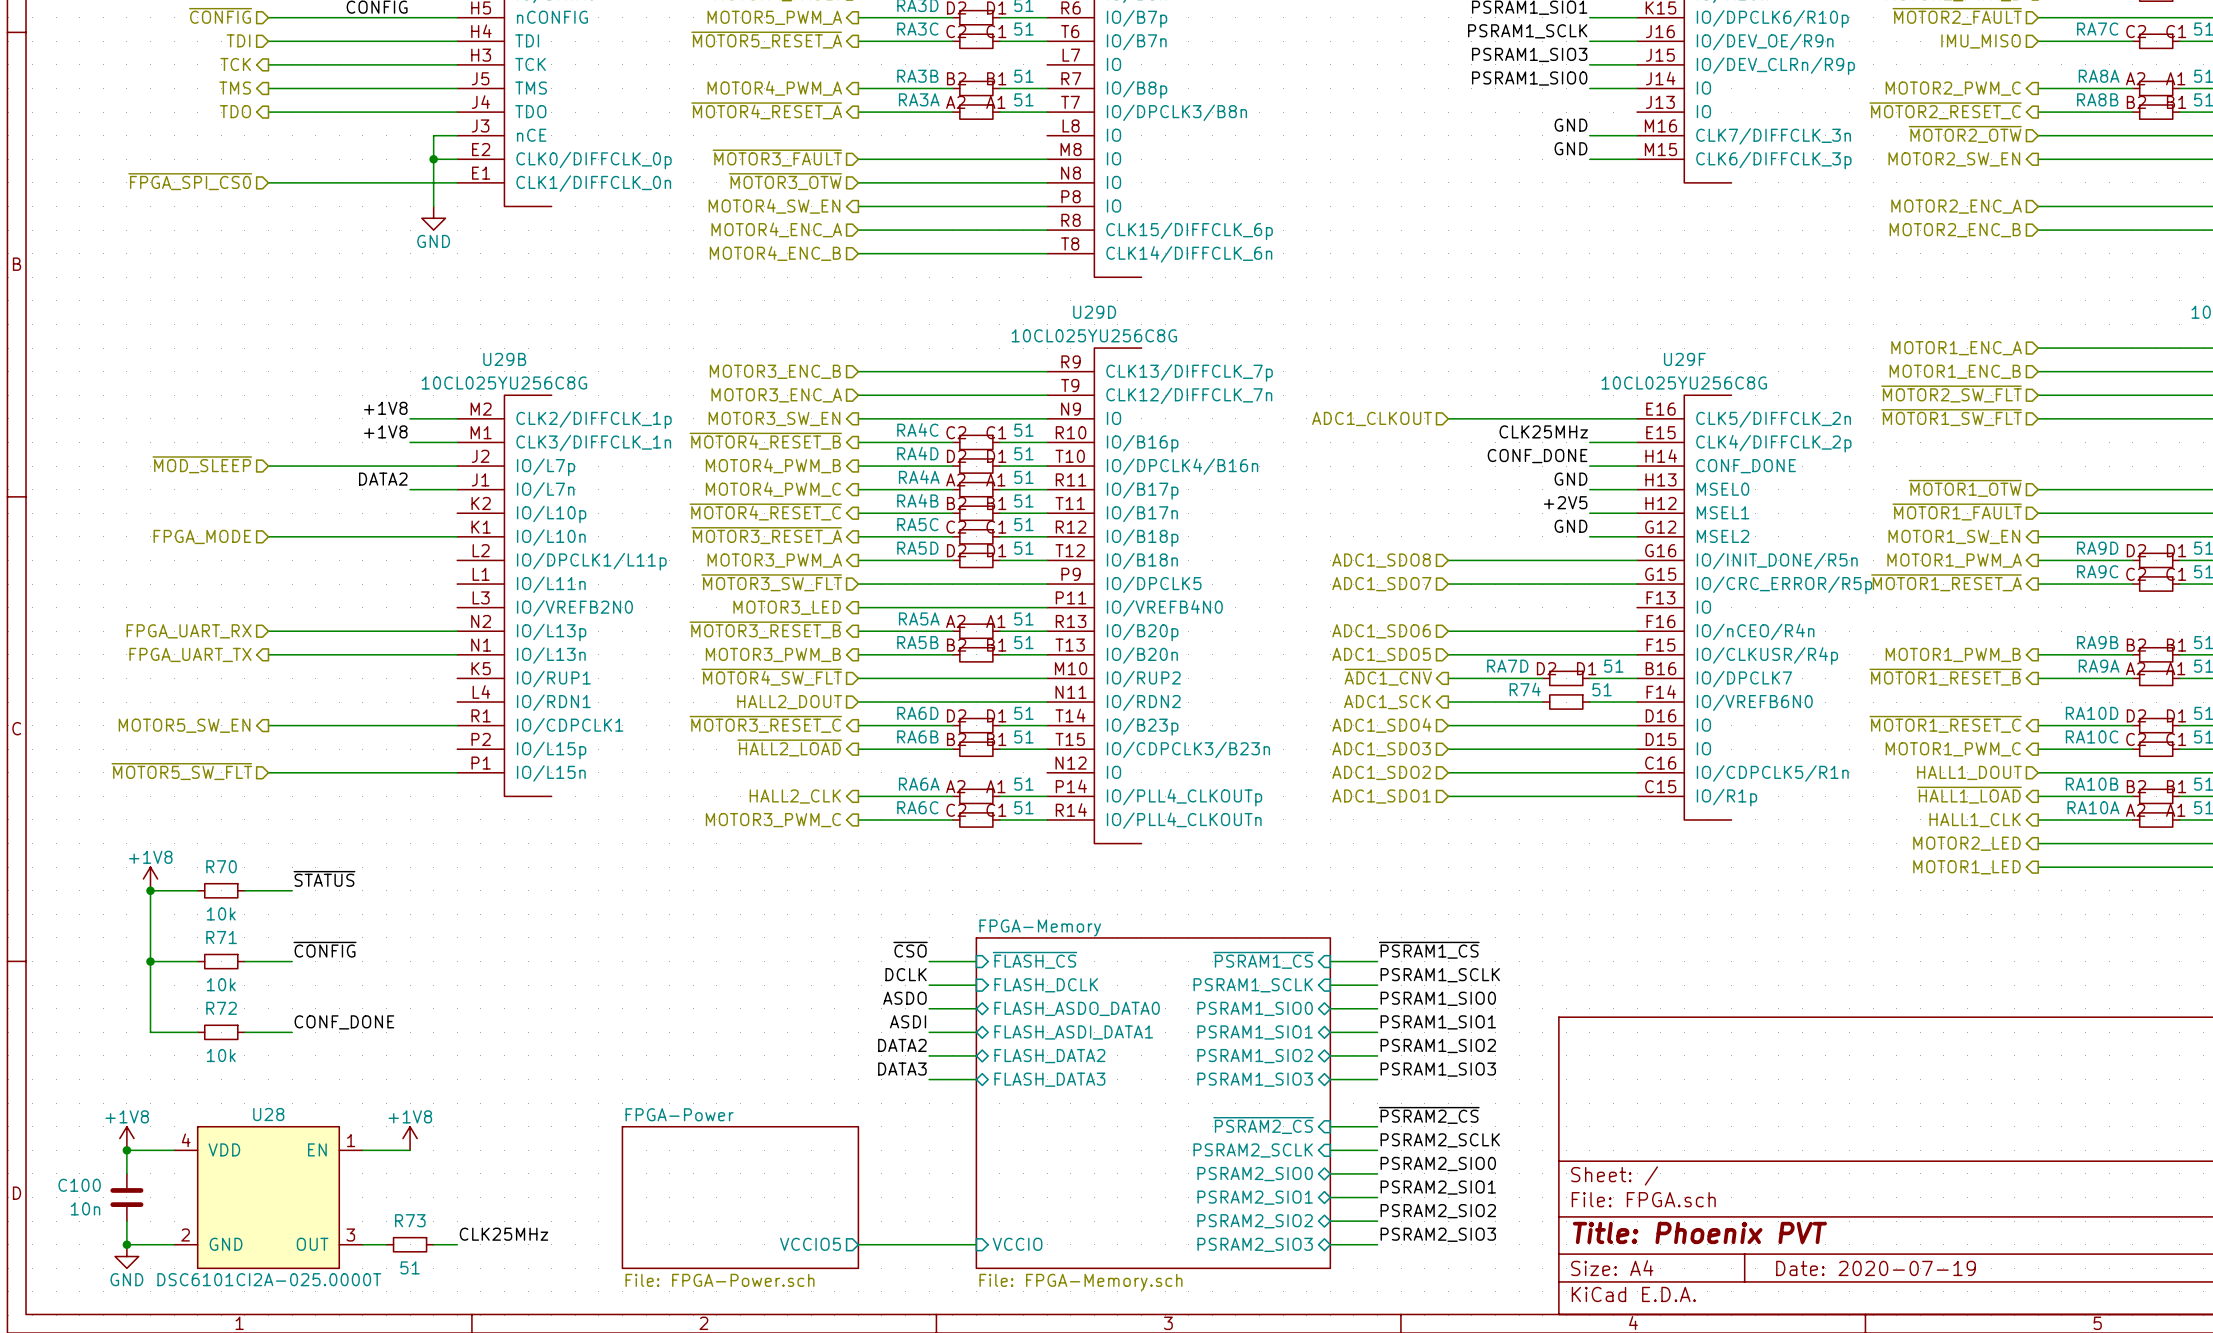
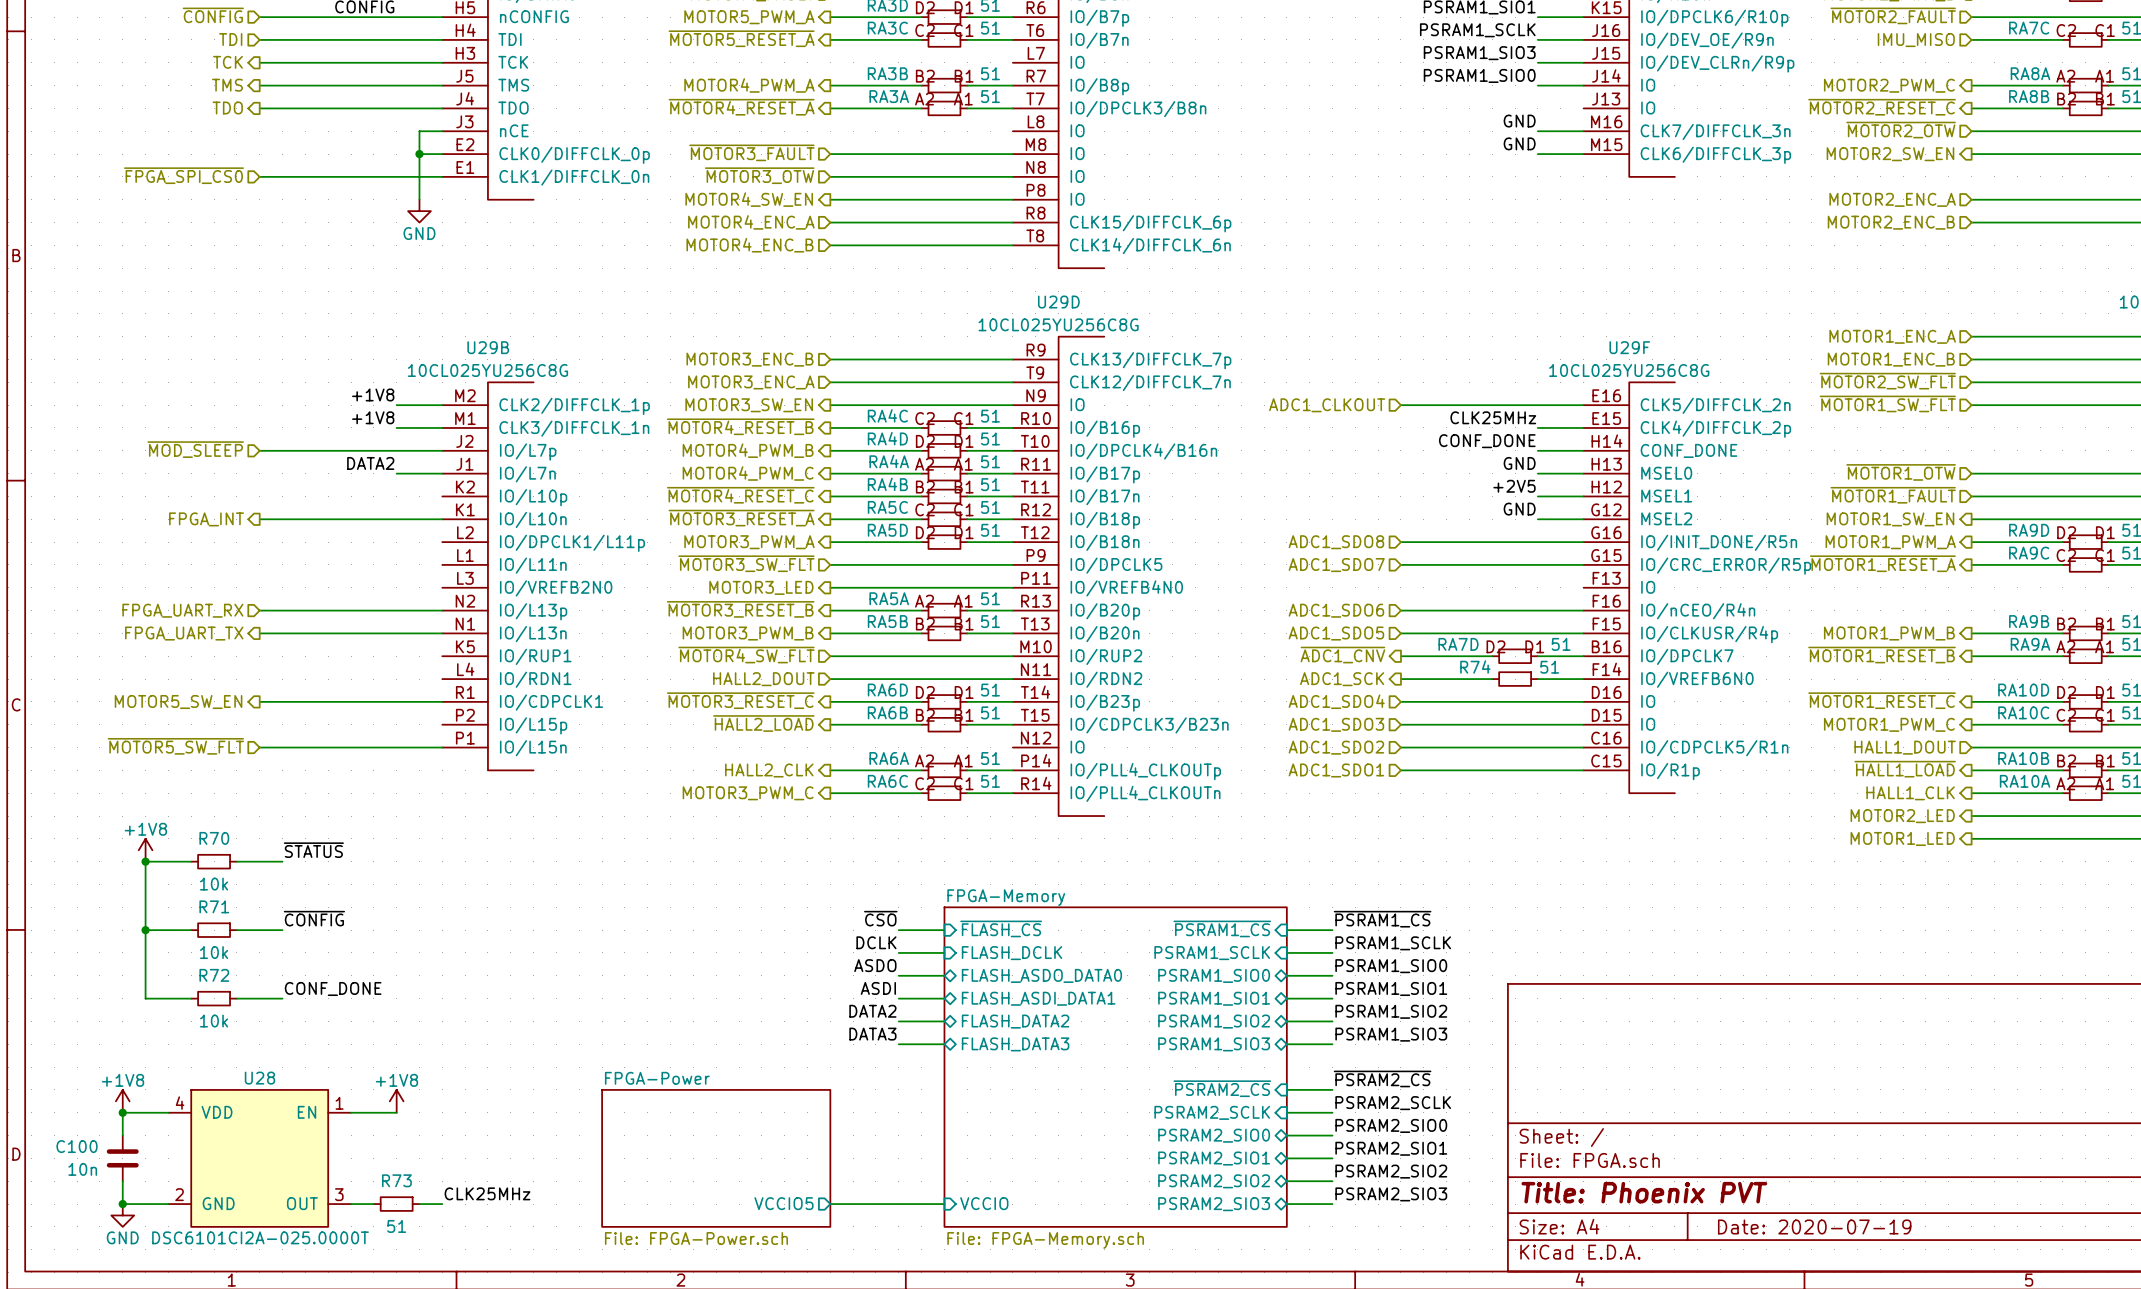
hierarchical label shape: input (202, 536) -> output (206, 519)
hierarchical label: FPGA_MODE (202, 536) -> FPGA_INT (206, 519)

